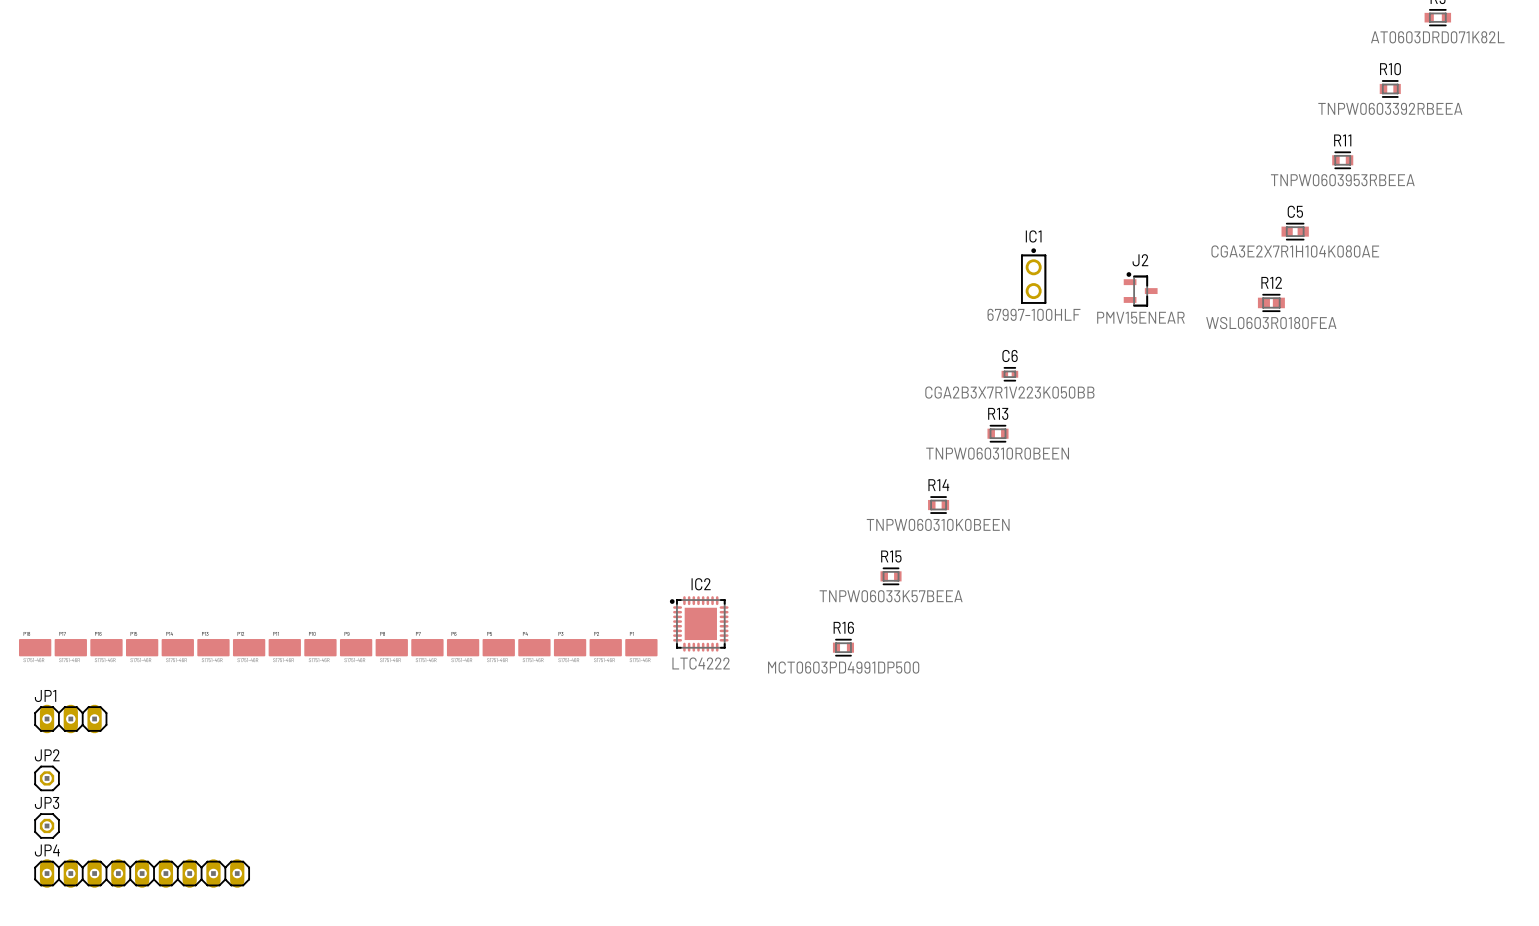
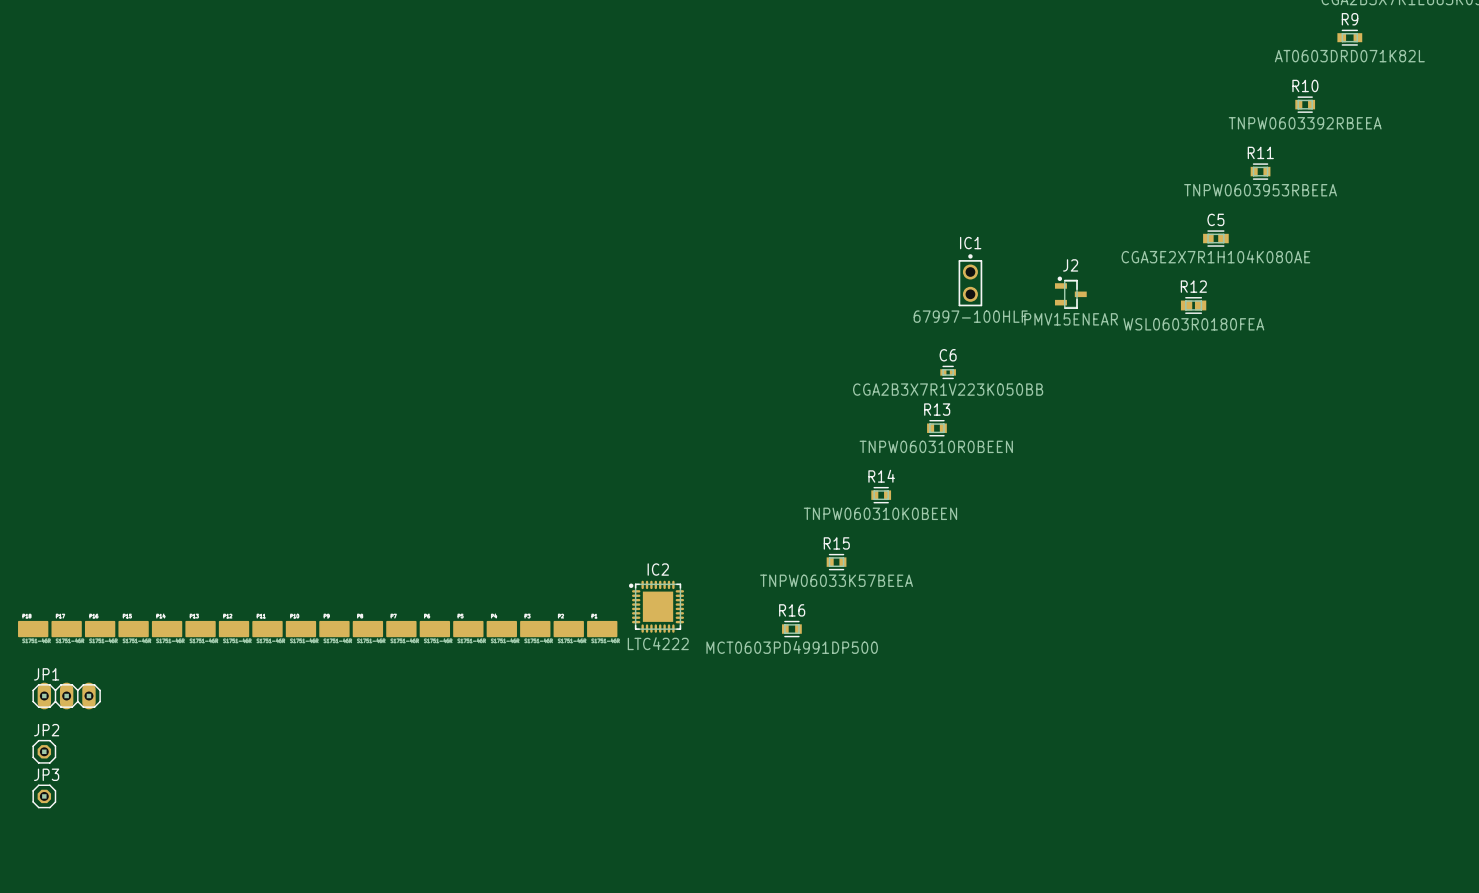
JP4: (142, 873) -> none

